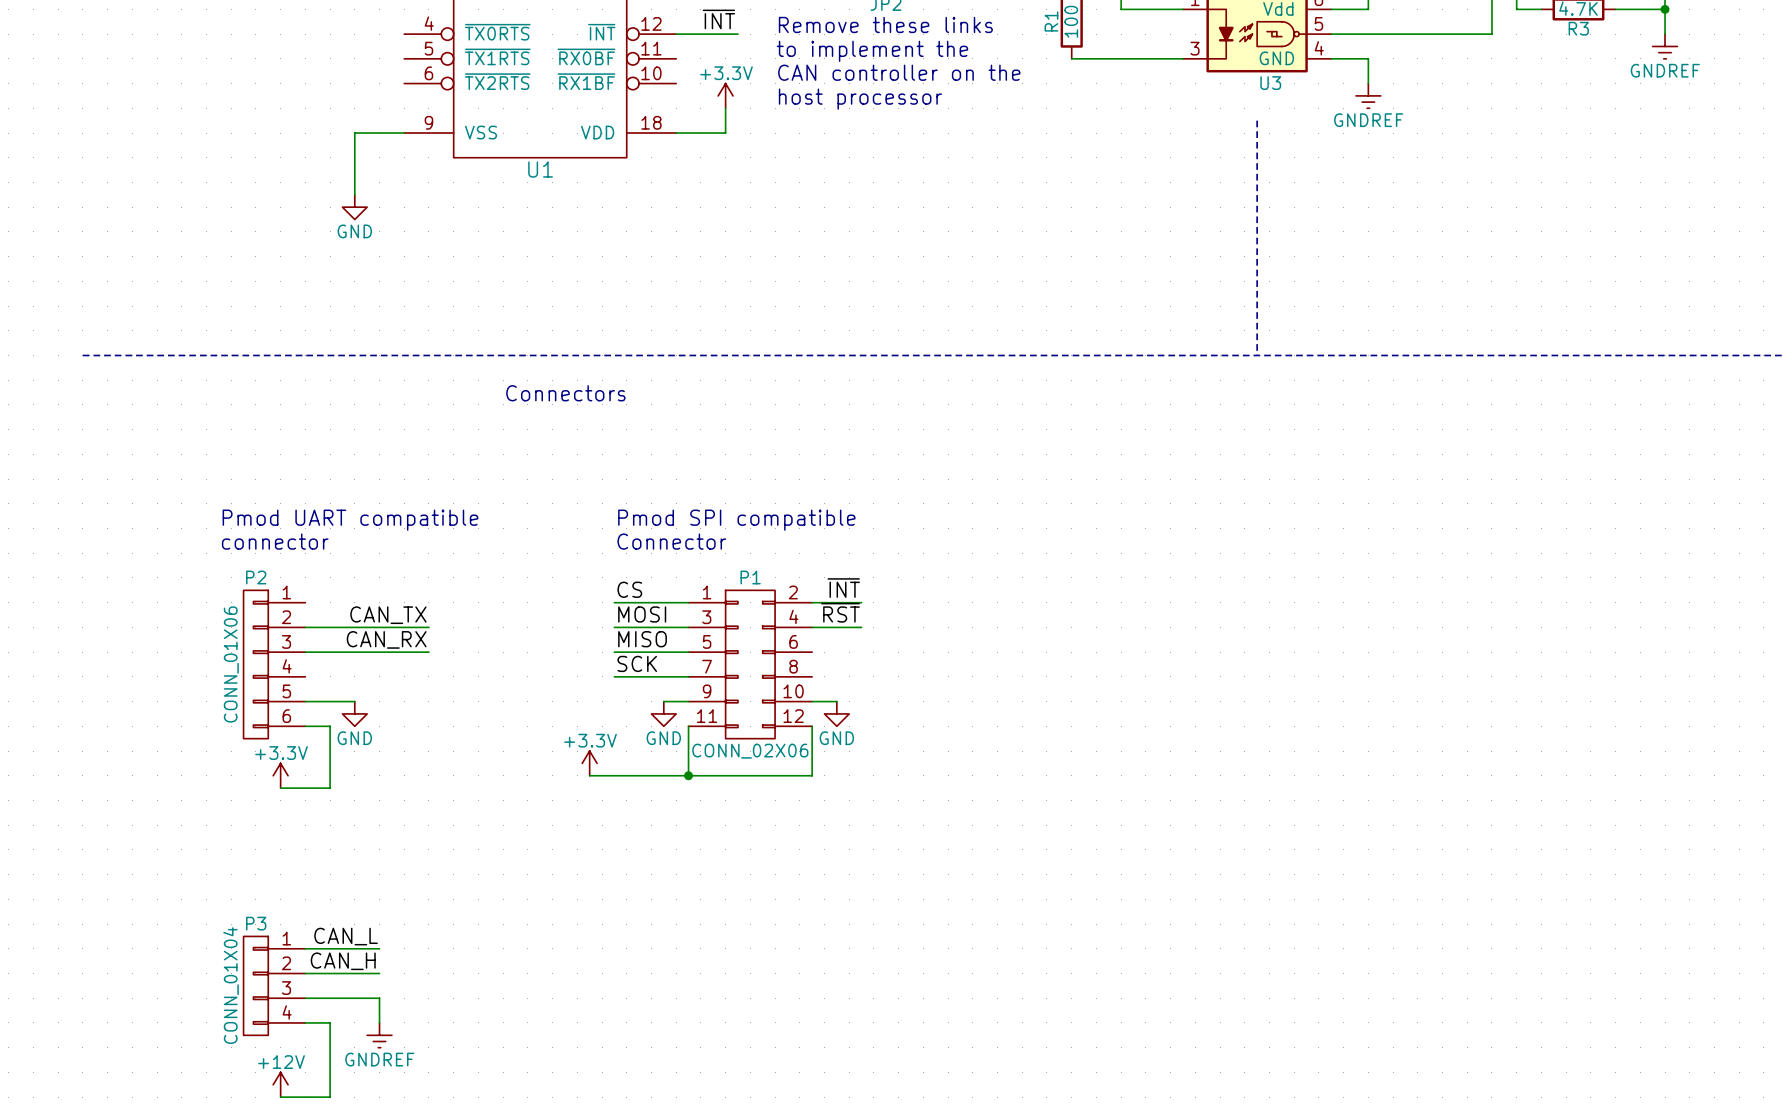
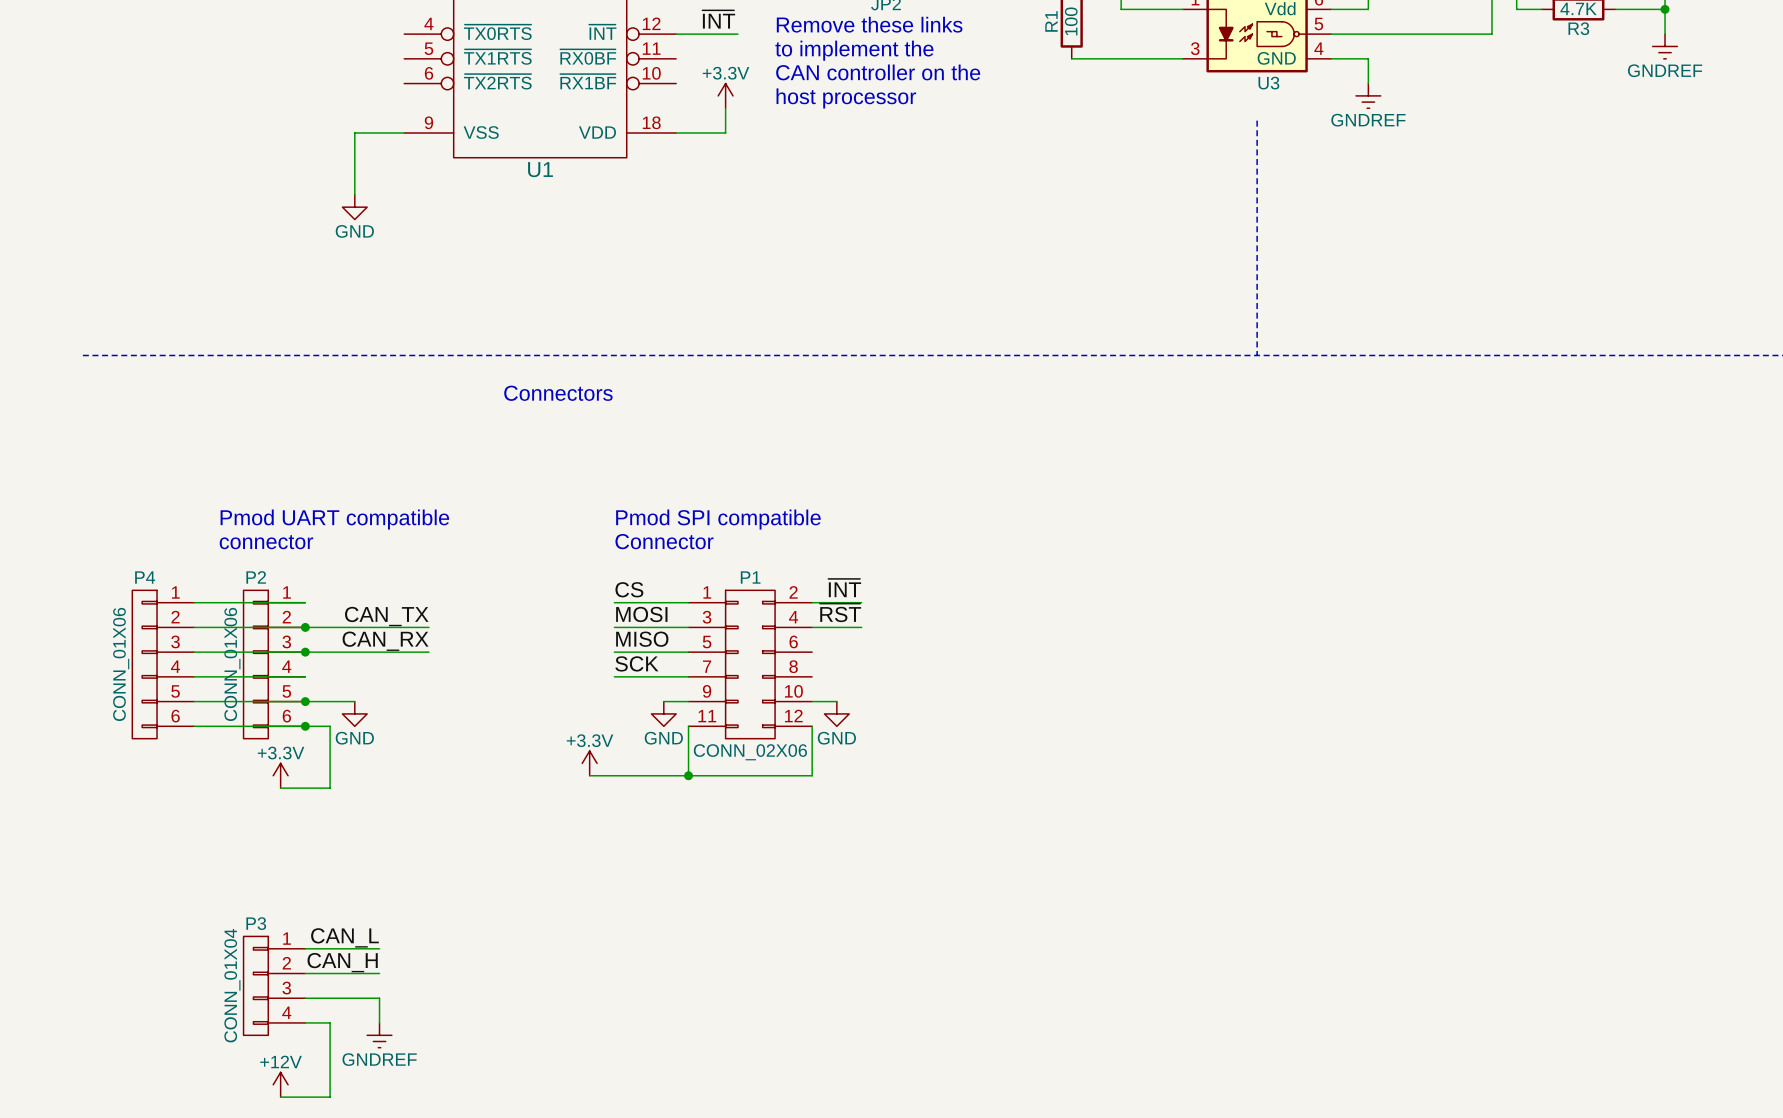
wire: none -> (194, 602) (305, 602)
wire: none -> (194, 627) (305, 627)
junction: none -> (305, 627)
wire: none -> (194, 652) (305, 652)
junction: none -> (305, 652)
P4: none -> CONN_01X06 (163, 664)
wire: none -> (194, 676) (305, 676)
wire: none -> (194, 701) (305, 701)
junction: none -> (305, 701)
wire: none -> (194, 726) (305, 726)
junction: none -> (305, 726)

